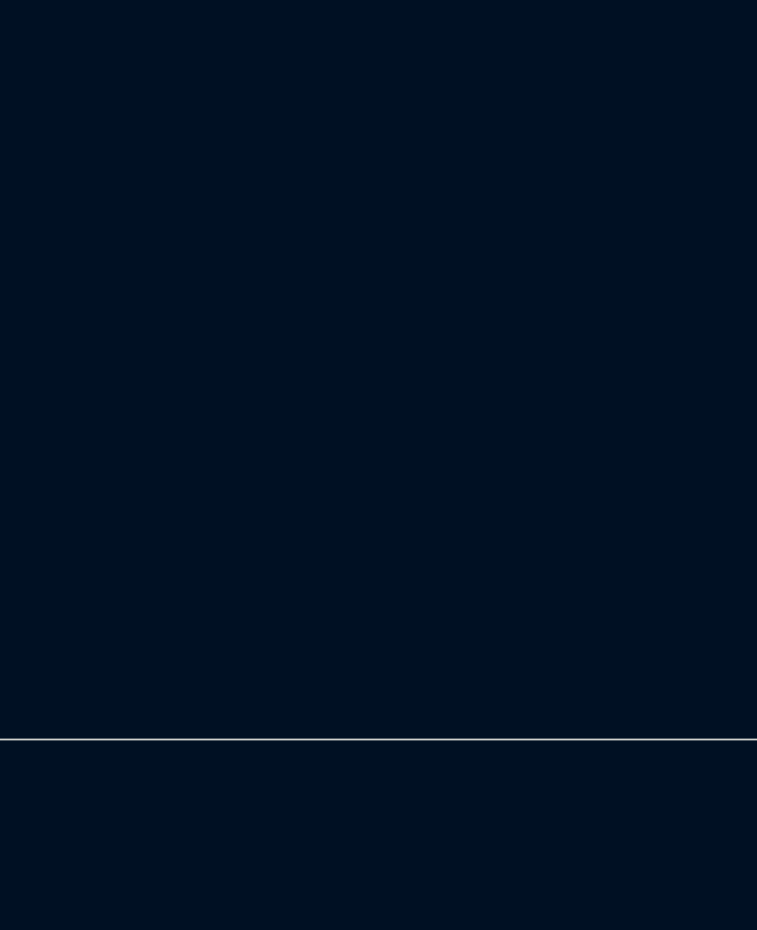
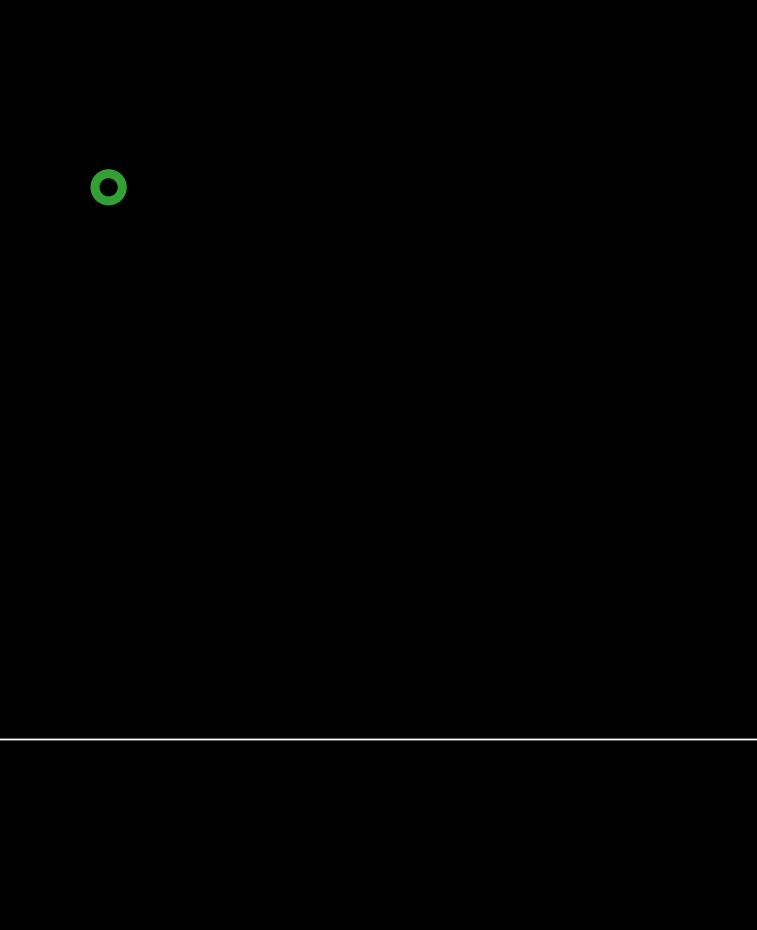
part: none -> (108, 187)

